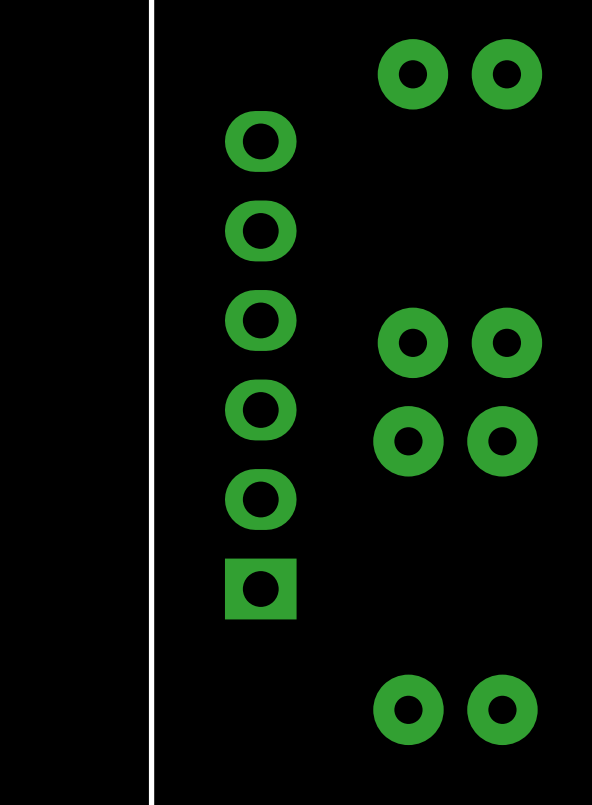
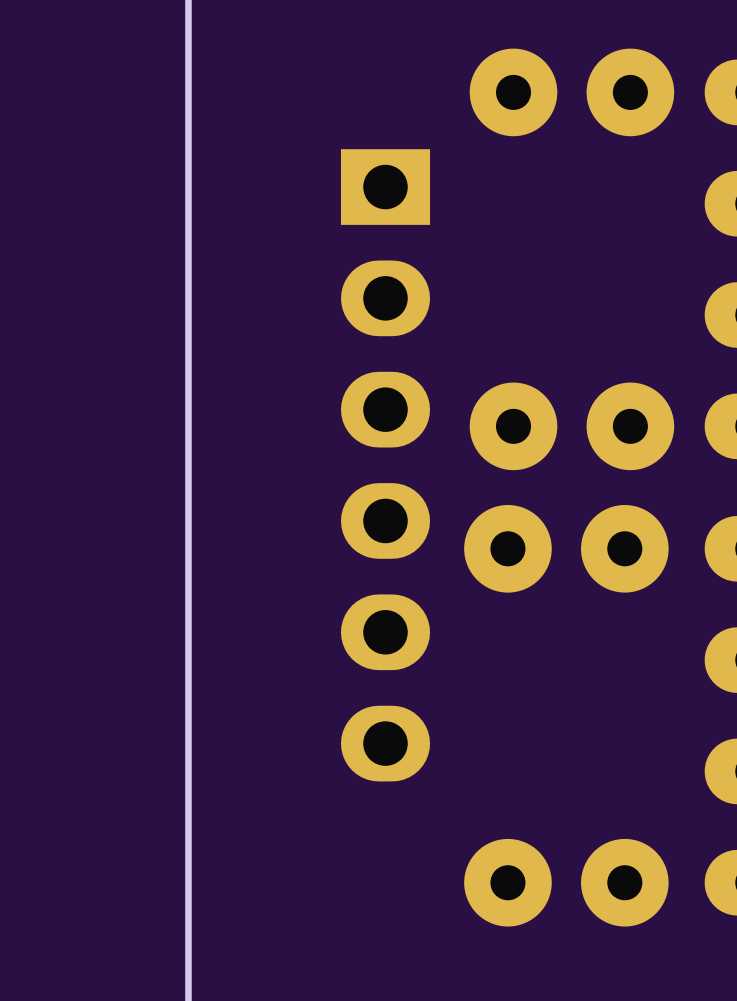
part rotation: 0° (260, 365) -> 180° (385, 465)

